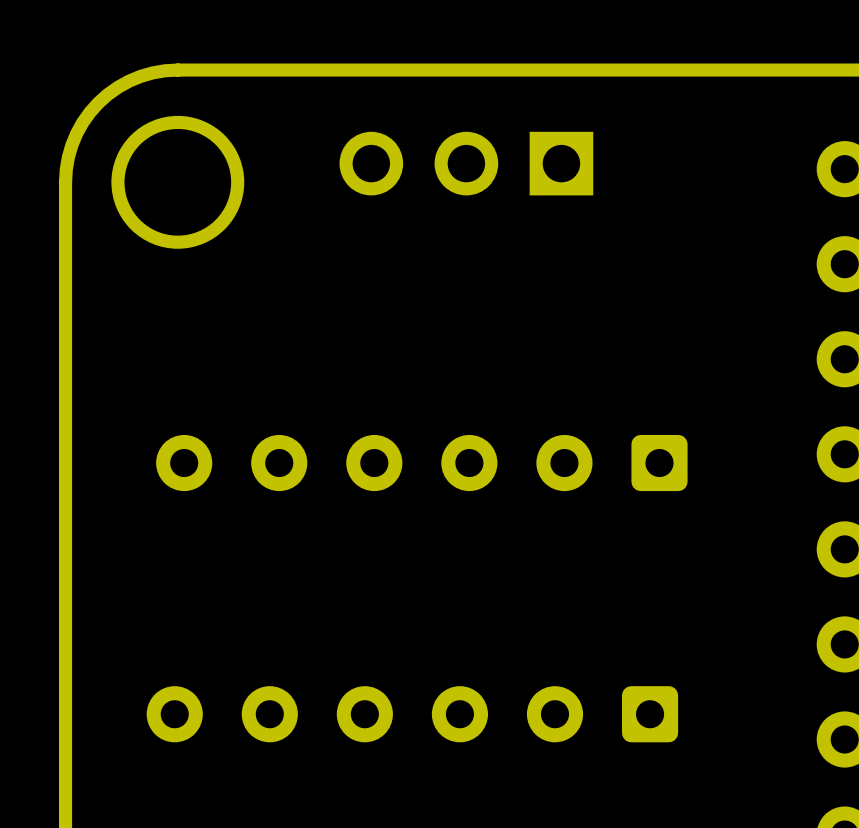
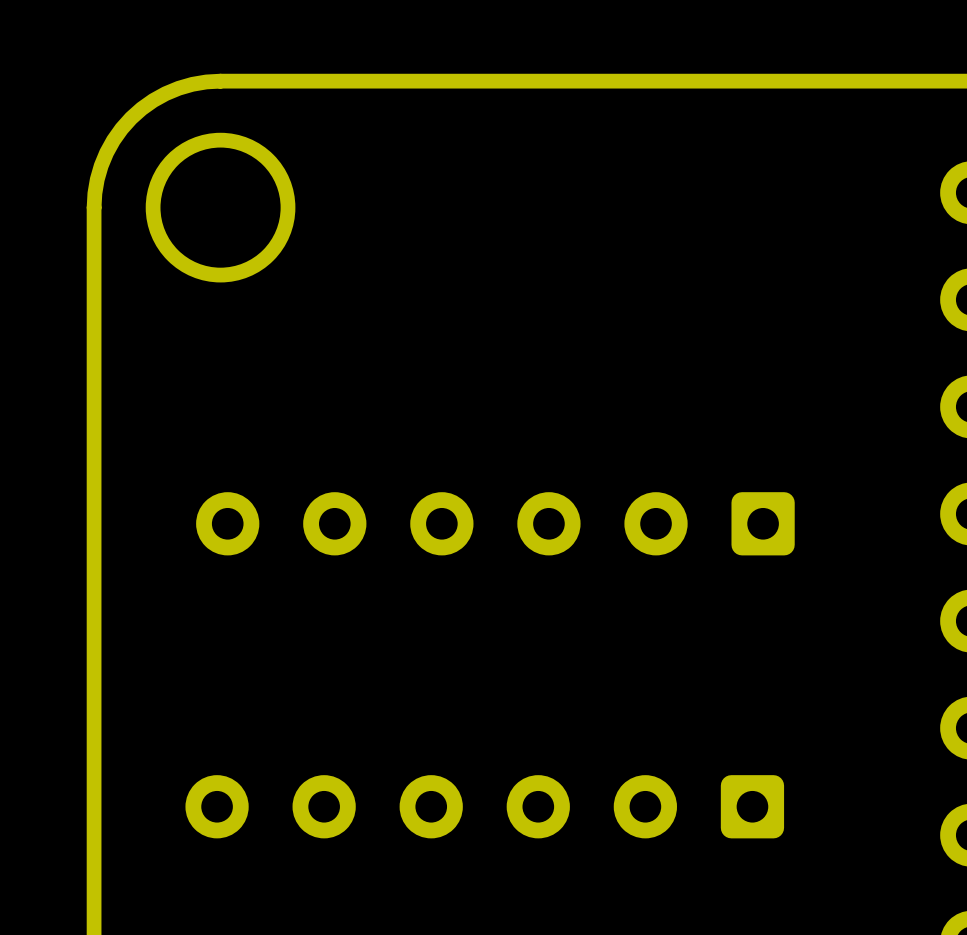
part: (466, 163) -> none

